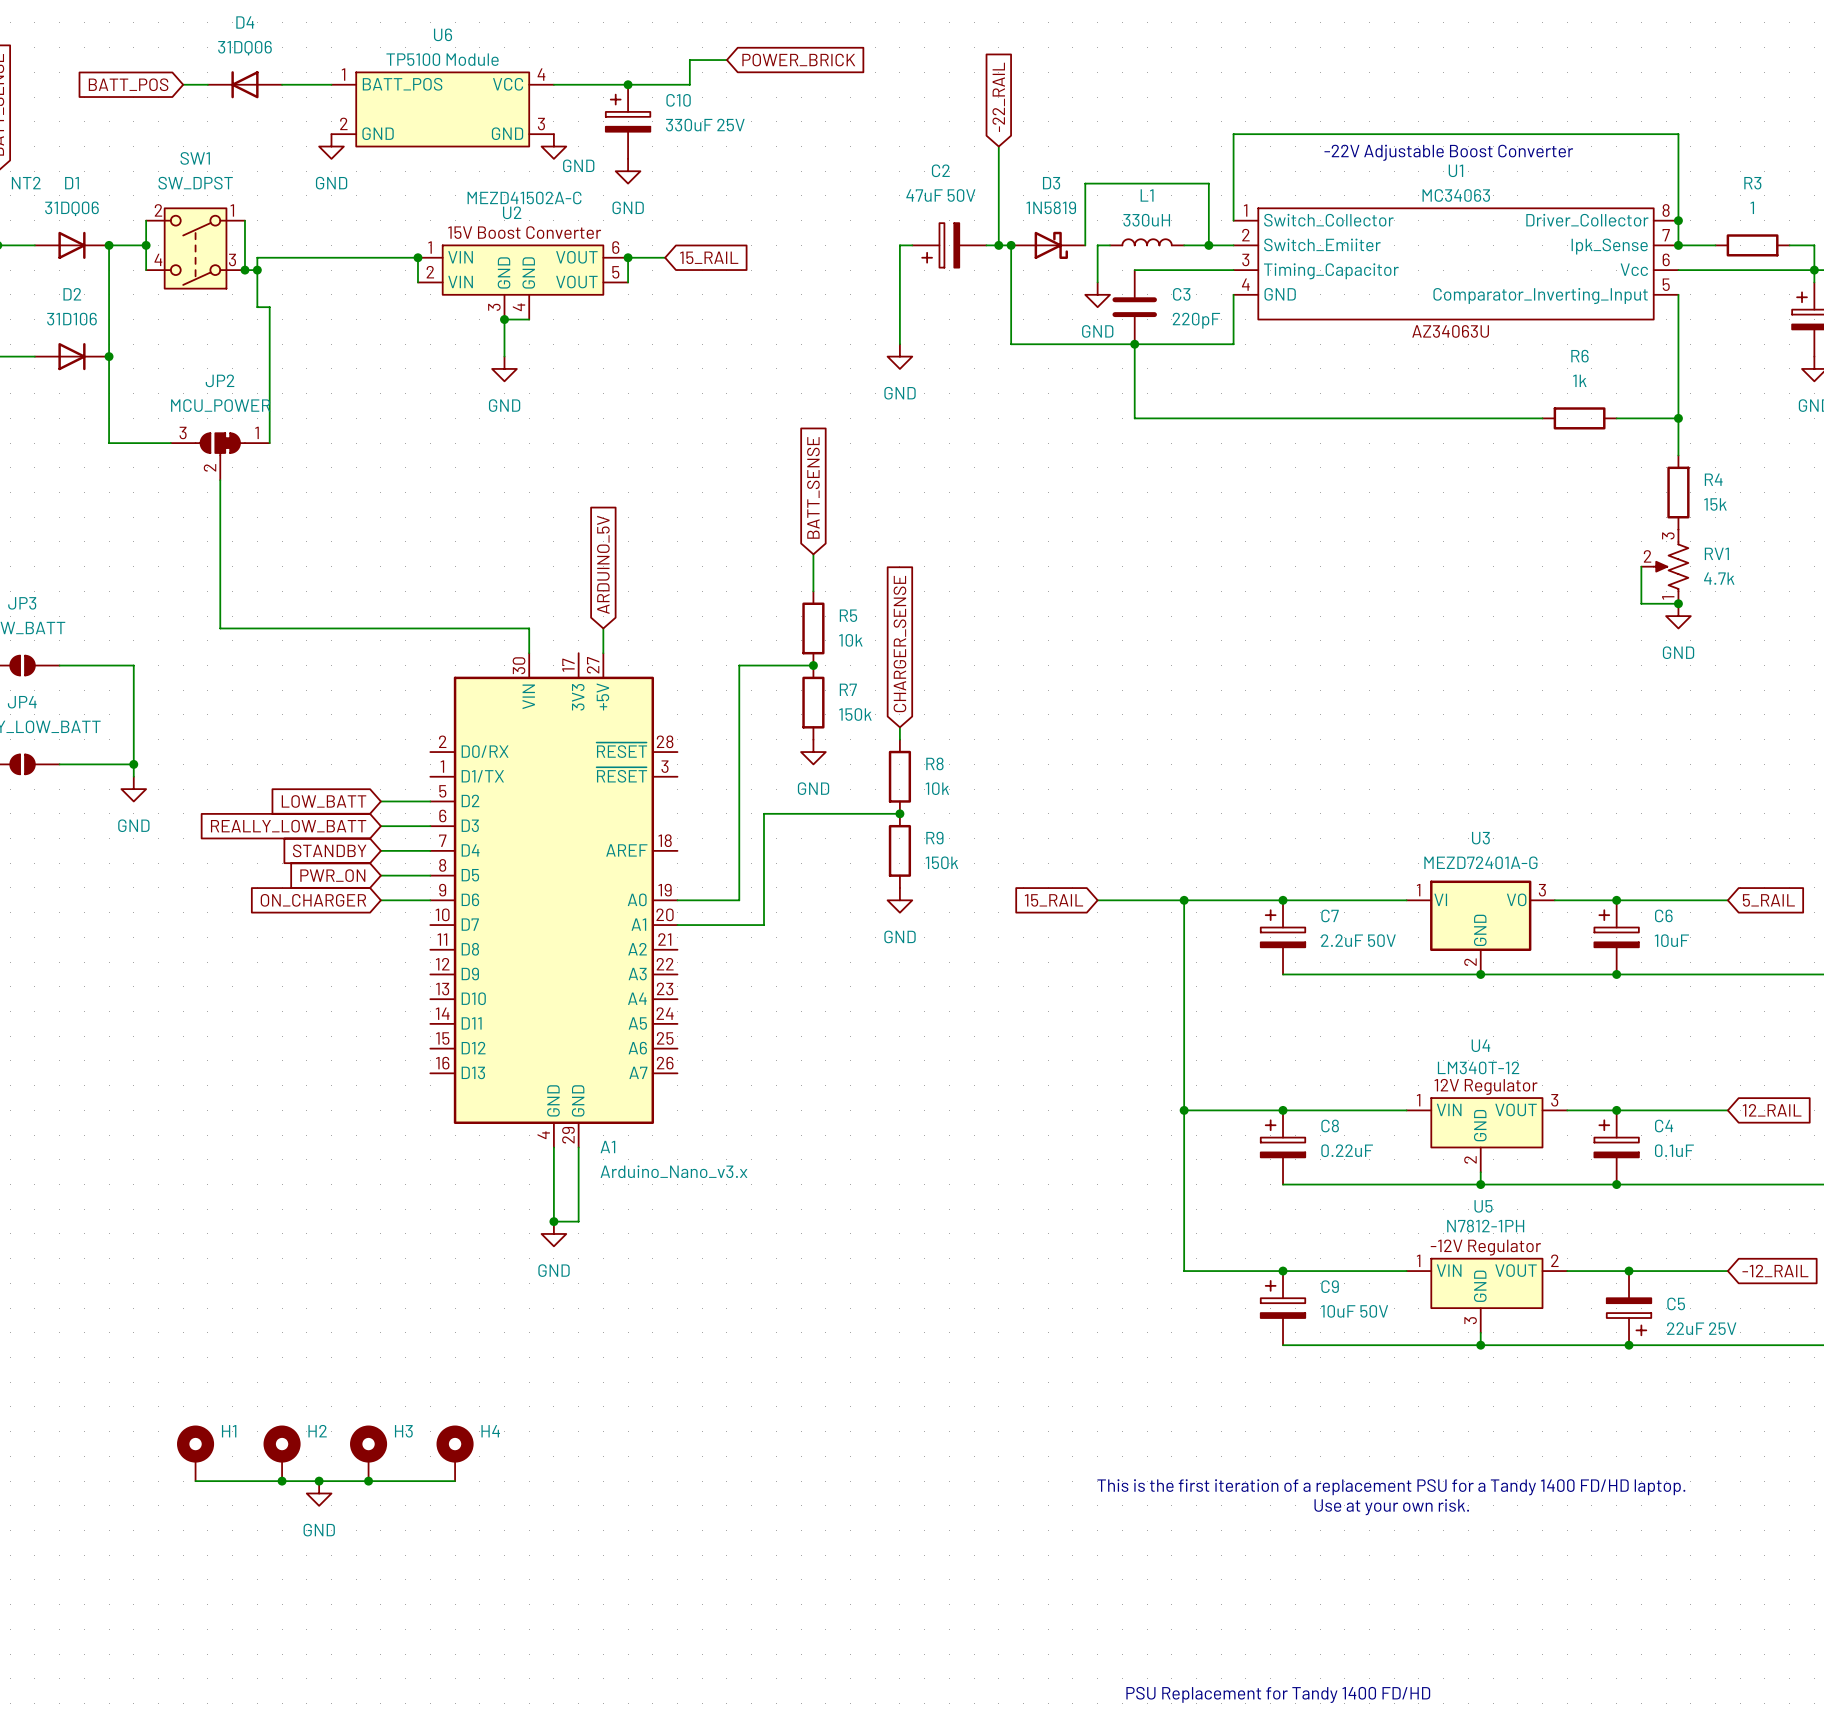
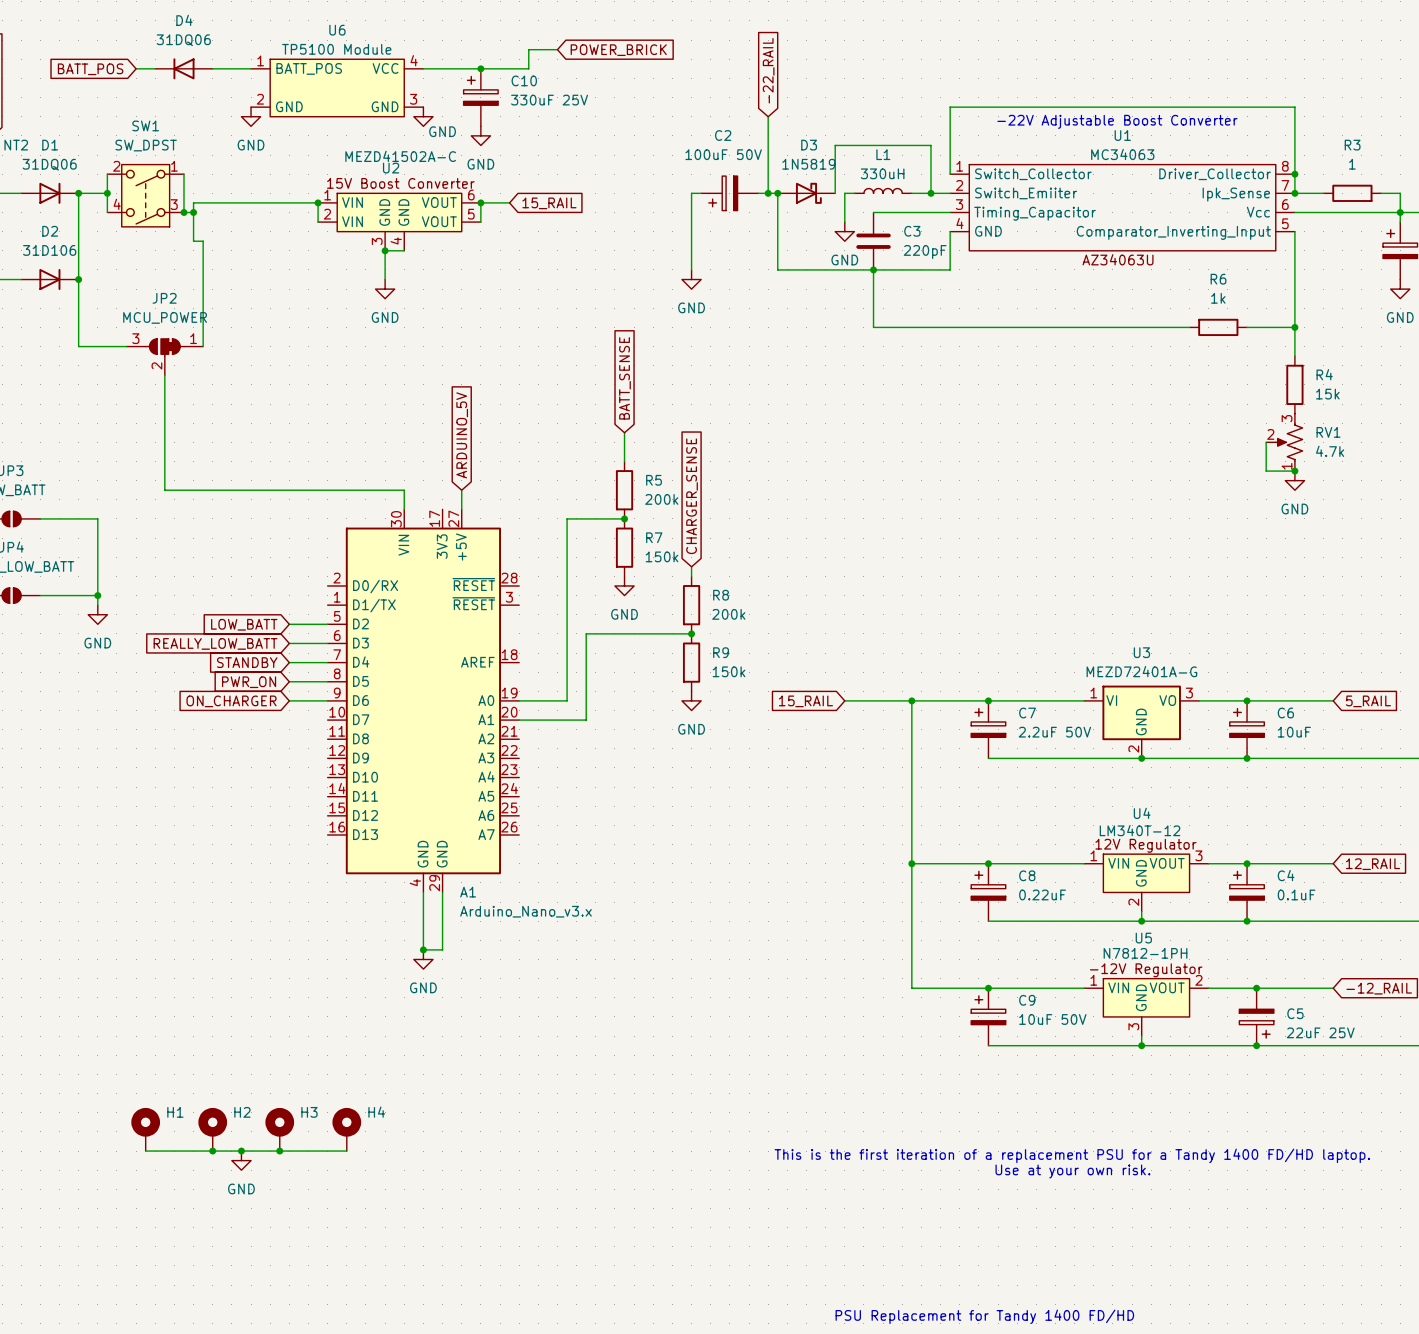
C2 value: 47uF 50V (940, 195) -> 100uF 50V (723, 154)
R5 value: 10k (850, 640) -> 200k (661, 499)
R8 value: 10k (937, 788) -> 200k (728, 614)

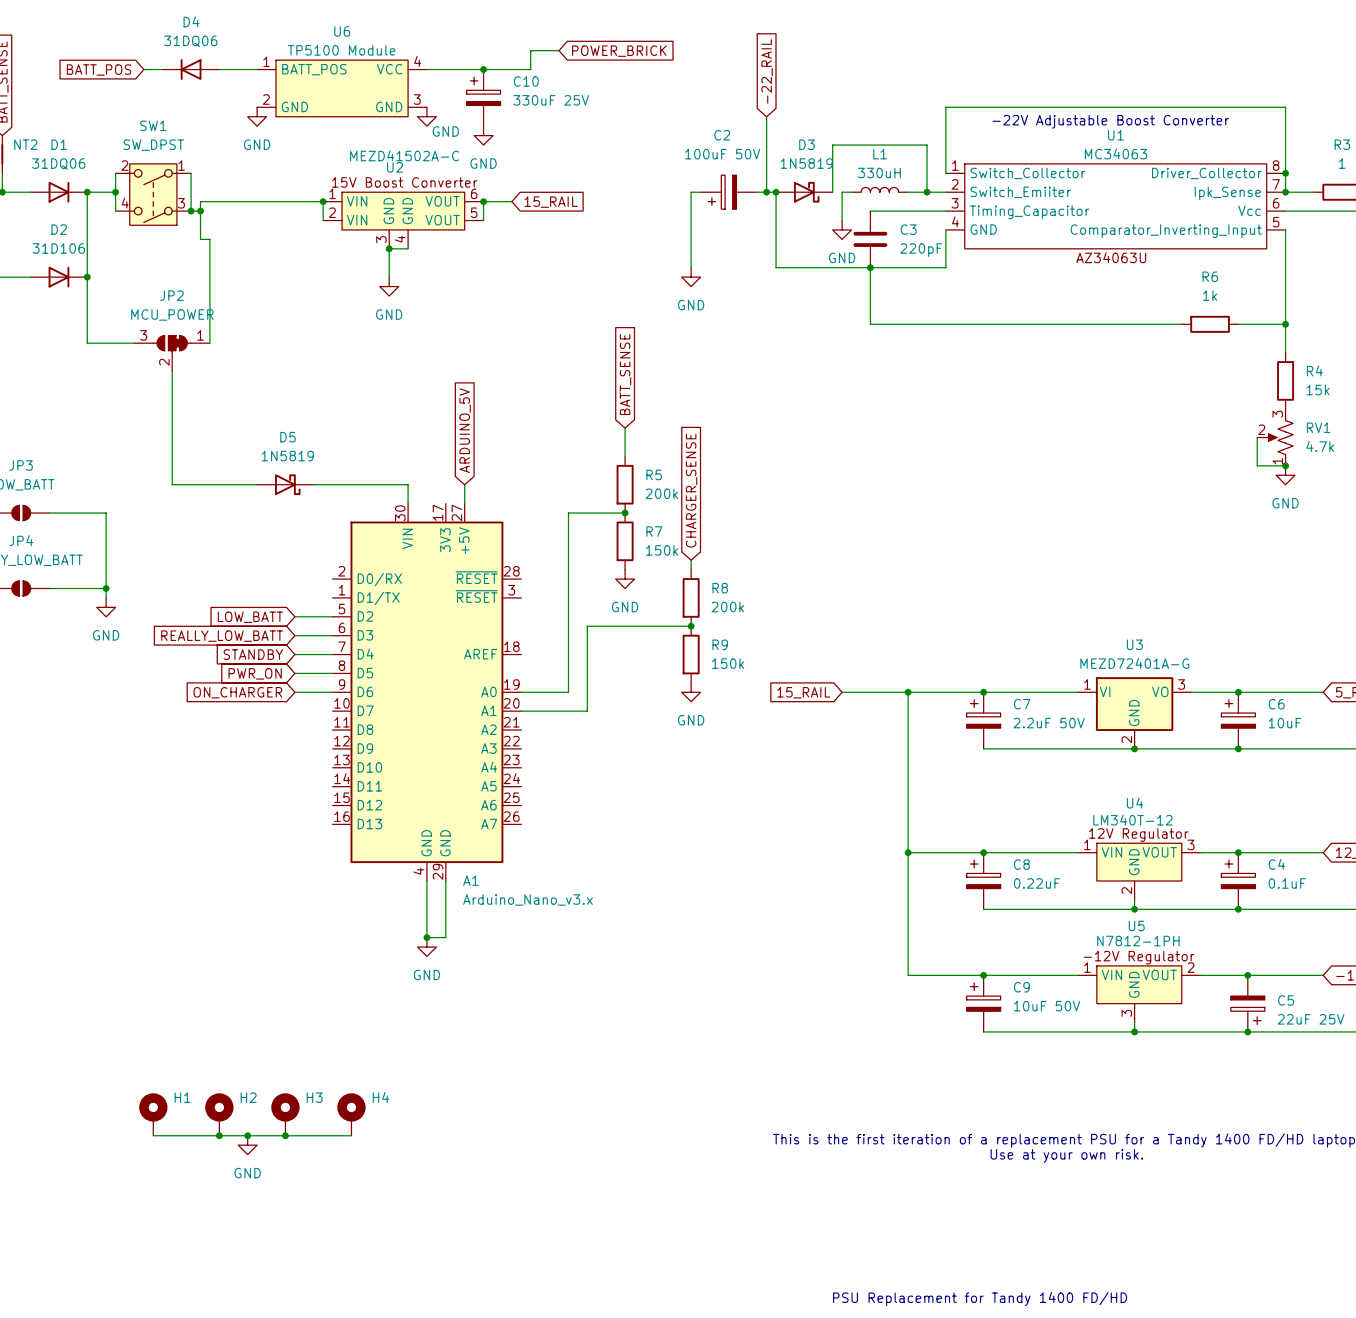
D5: none -> 1N5819 (285, 484)

